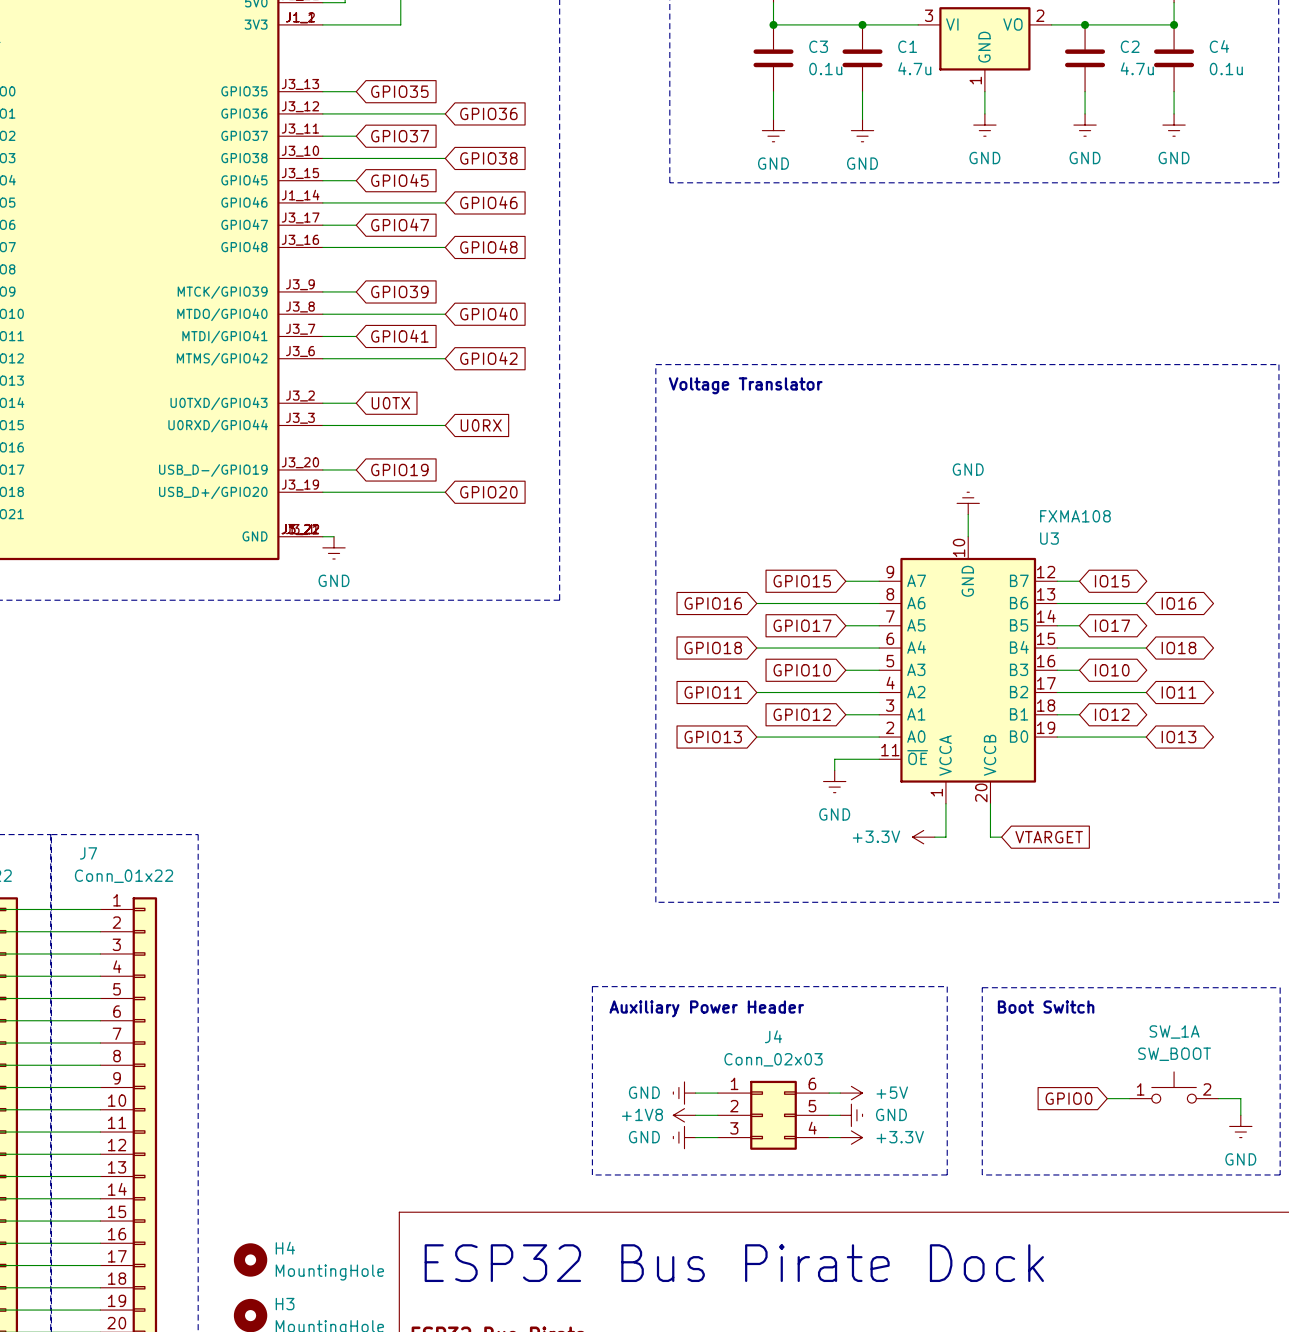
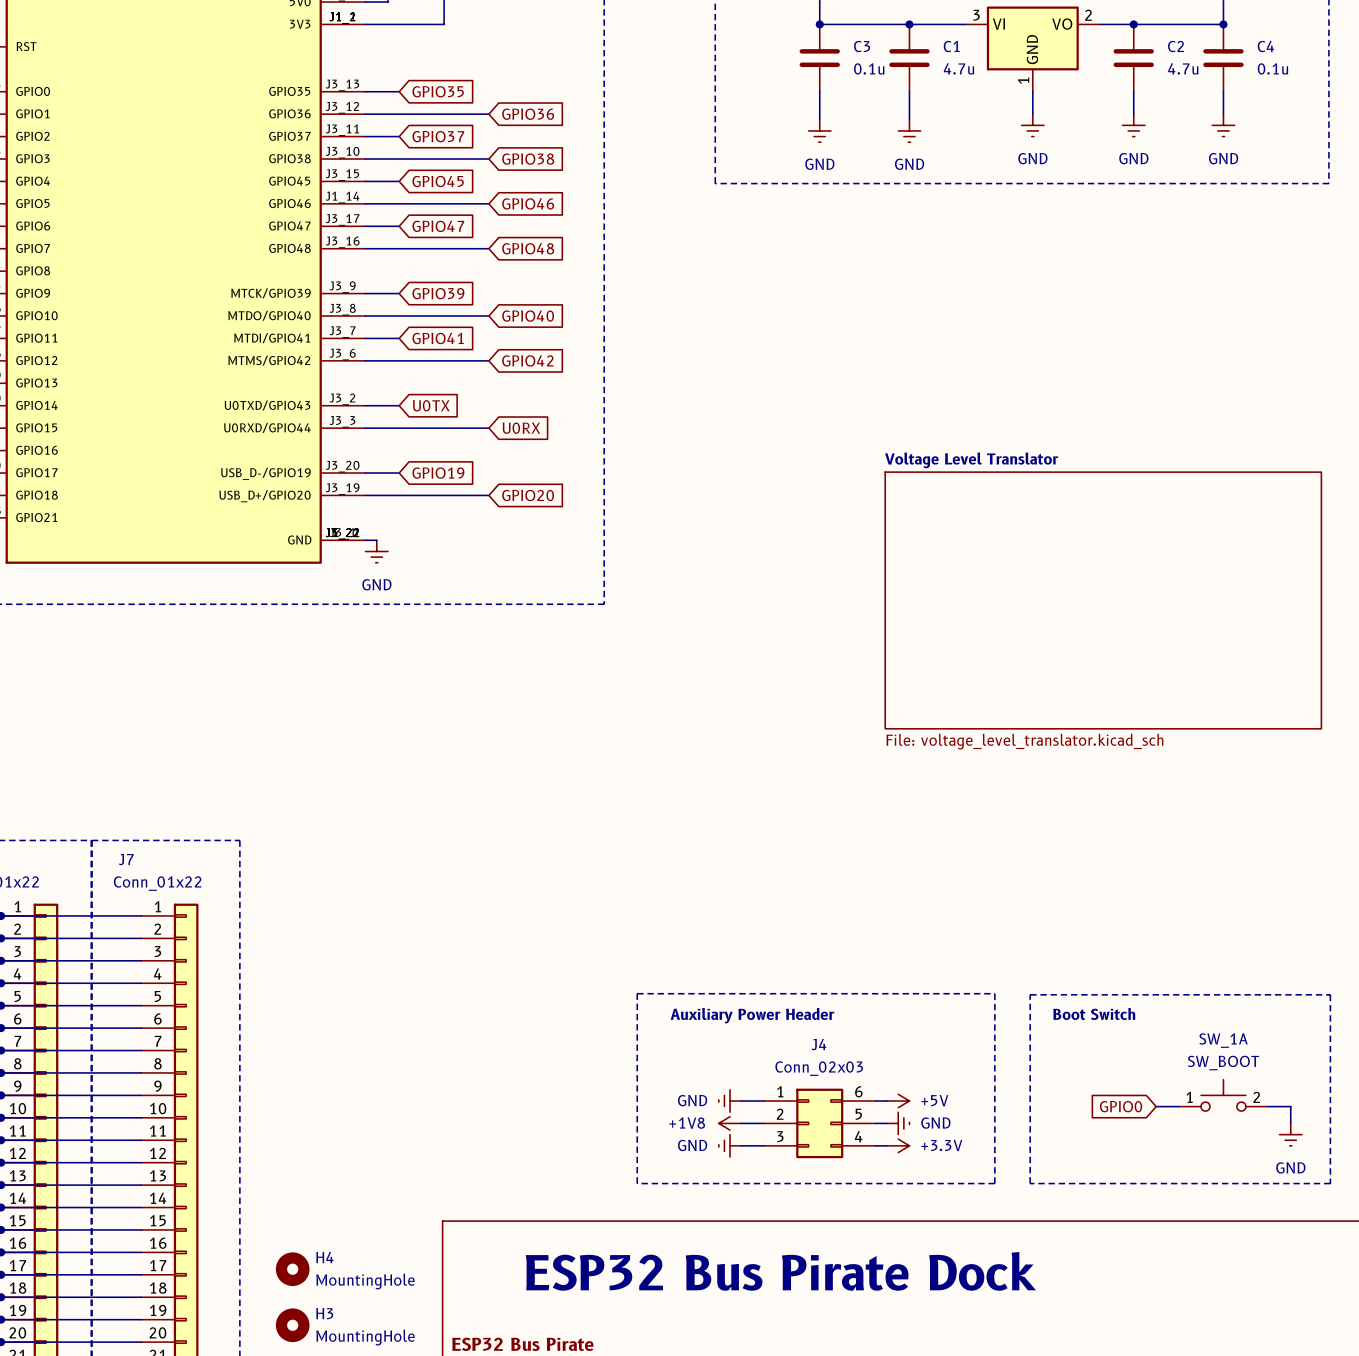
line: (655, 364) (1278, 364) (1278, 902) (655, 902) (655, 364) -> none
text: Voltage Translator (745, 385) -> none
power symbol: GND (968, 503) -> none
wire: (968, 514) (968, 536) -> none
global label: GPIO15 (802, 581) -> none
wire: (845, 581) (879, 581) -> none
wire: (1057, 581) (1079, 581) -> none
global label: IO15 (1112, 581) -> none
sheet Voltage Level Translator: none -> File: voltage_level_translator.kicad_sch (1103, 600)
global label: GPIO16 (713, 603) -> none
wire: (756, 603) (879, 603) -> none
wire: (1057, 603) (1146, 603) -> none
global label: IO16 (1178, 603) -> none
global label: GPIO17 (802, 625) -> none
wire: (845, 625) (879, 625) -> none
wire: (1057, 625) (1079, 625) -> none
global label: IO17 (1112, 625) -> none
global label: GPIO18 (713, 648) -> none
wire: (756, 648) (879, 648) -> none
wire: (1057, 648) (1146, 648) -> none
global label: IO18 (1178, 648) -> none
global label: GPIO10 (802, 670) -> none
wire: (845, 670) (879, 670) -> none
U3: FXMA108 (968, 670) -> none
wire: (1057, 670) (1079, 670) -> none
global label: IO10 (1112, 670) -> none
global label: GPIO11 (713, 692) -> none
wire: (756, 692) (879, 692) -> none
wire: (1057, 692) (1146, 692) -> none
global label: IO11 (1178, 692) -> none
global label: GPIO12 (802, 714) -> none
wire: (845, 714) (879, 714) -> none
wire: (1057, 714) (1079, 714) -> none
global label: IO12 (1112, 714) -> none
global label: GPIO13 (713, 737) -> none
wire: (756, 737) (879, 737) -> none
wire: (1057, 737) (1146, 737) -> none
global label: IO13 (1178, 737) -> none
wire: (879, 759) (834, 759) (834, 770) -> none
power symbol: GND (834, 781) -> none
wire: (945, 803) (945, 837) (934, 837) -> none
wire: (990, 803) (990, 837) (1001, 837) -> none
power symbol: +3.3V (923, 837) -> none
global label: VTARGET (1049, 837) -> none

